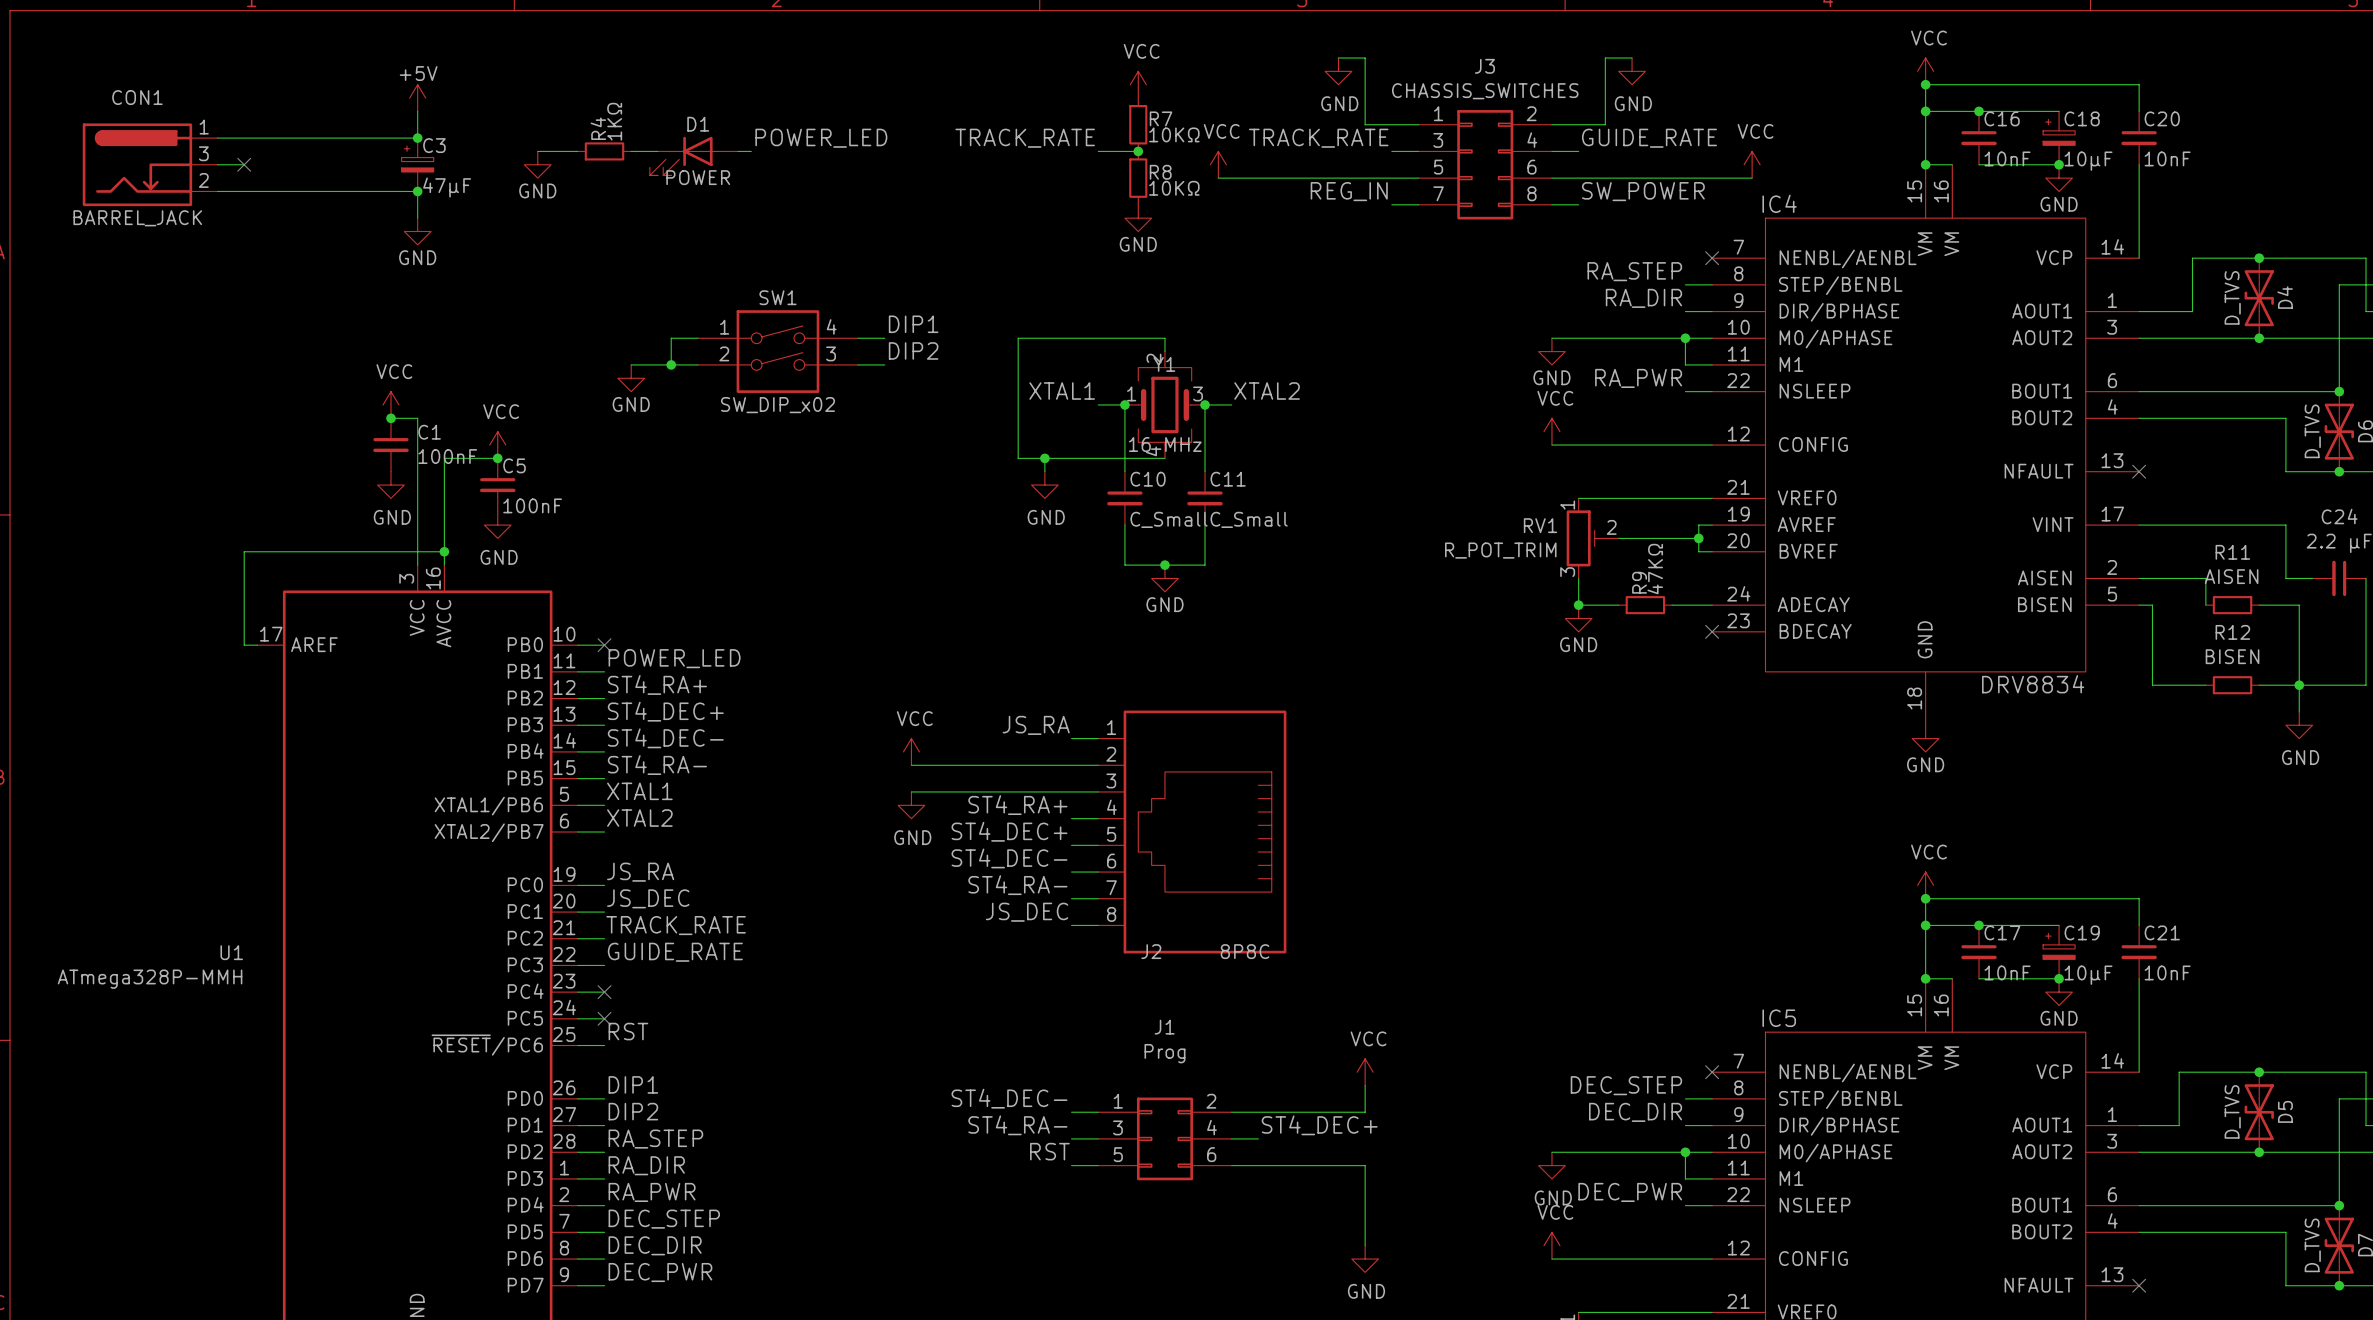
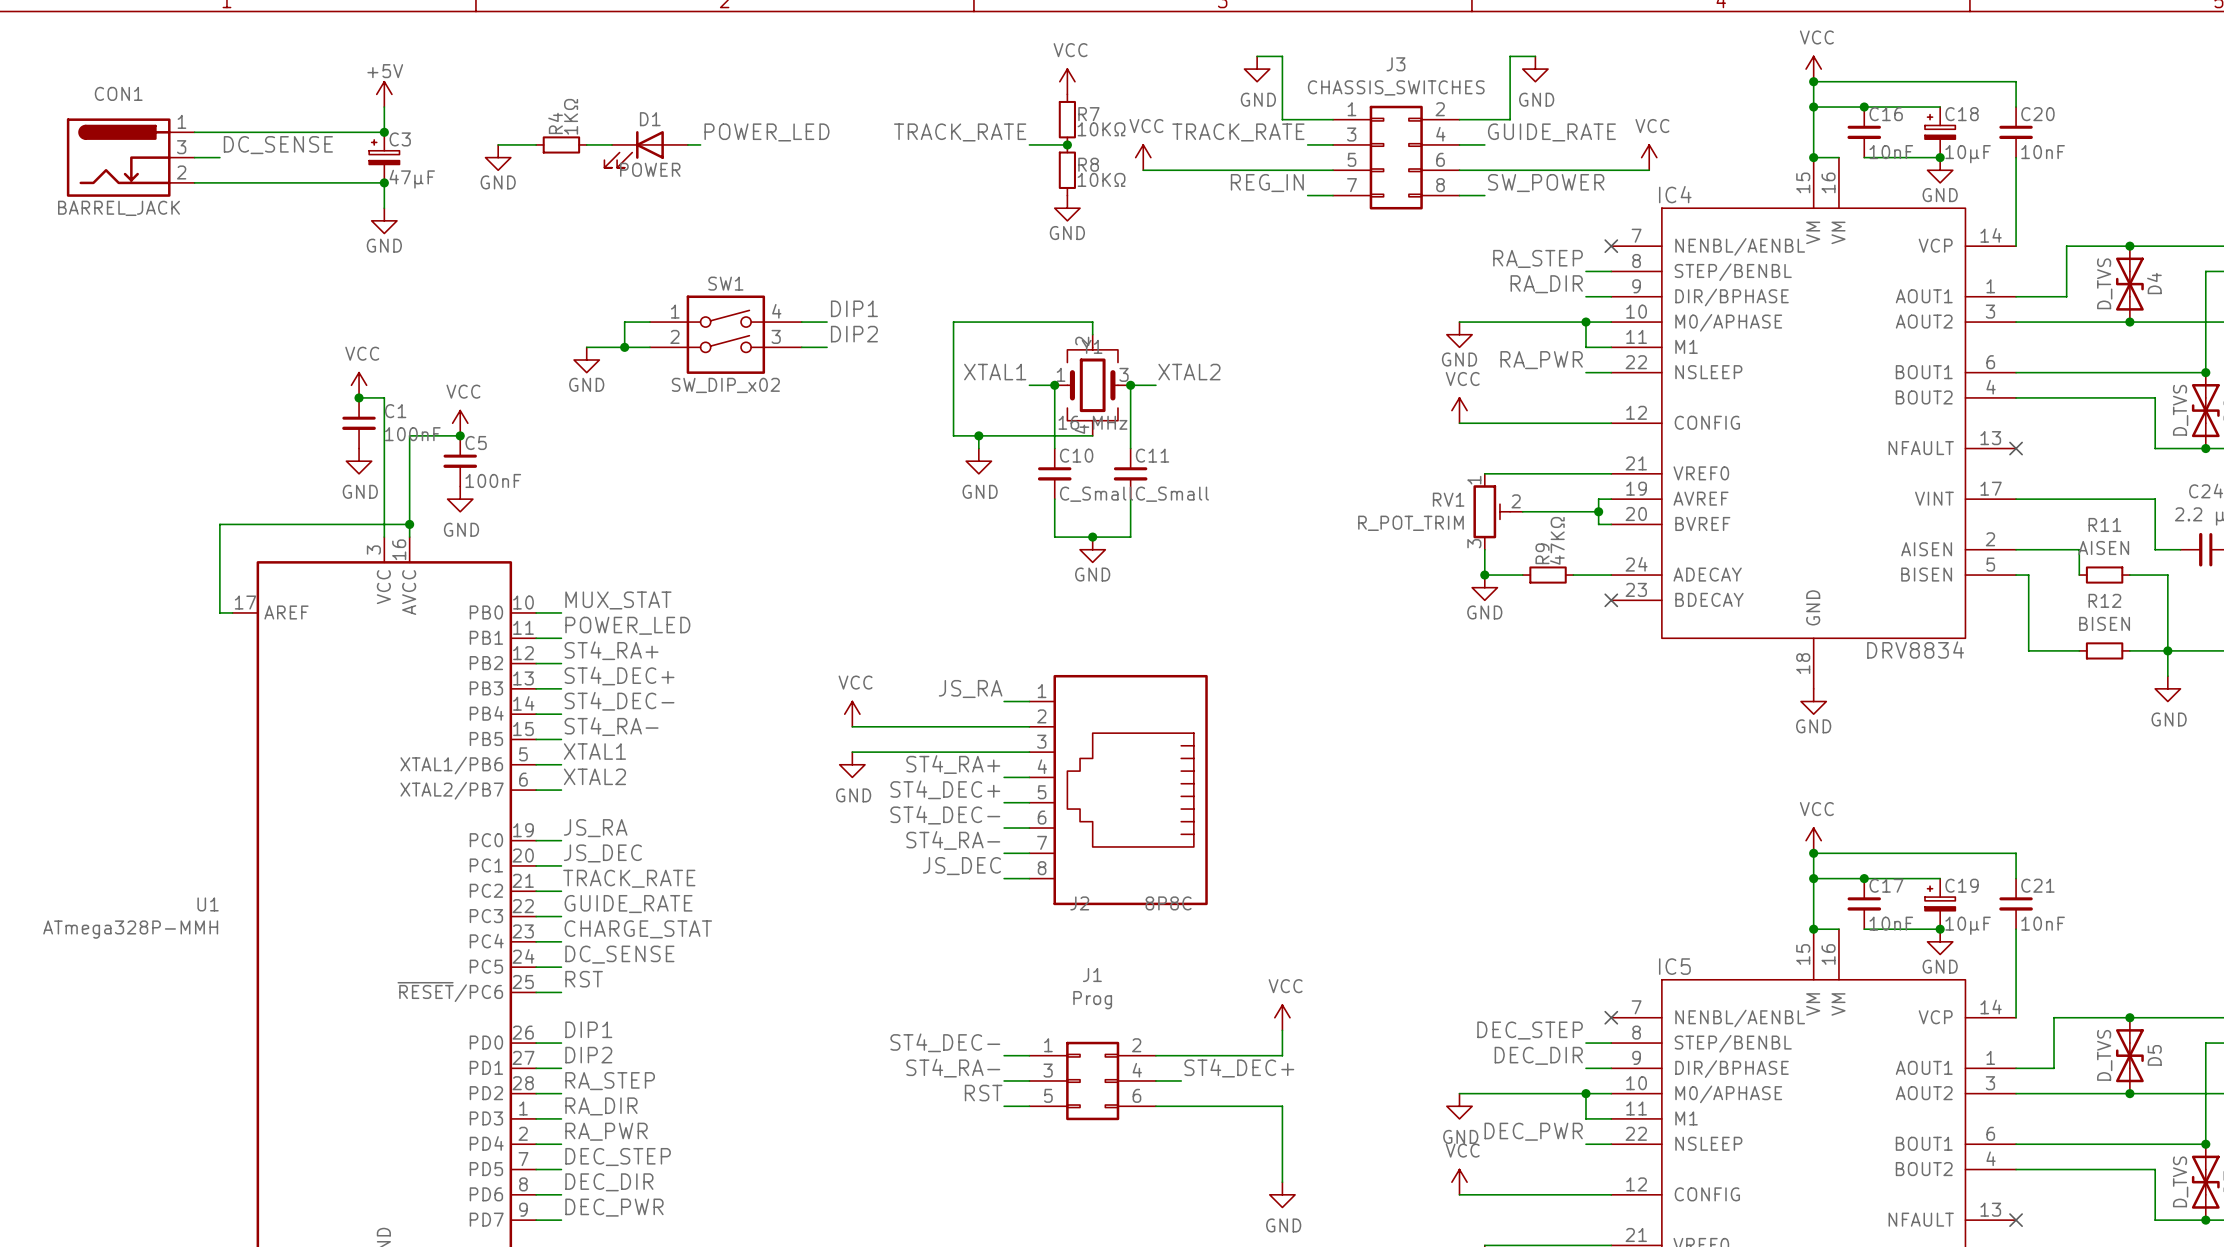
label: none -> DC_SENSE (278, 145)
no-connect mark: (244, 164) -> none
label: none -> MUX_STAT (618, 600)
no-connect mark: (604, 645) -> none
label: none -> CHARGE_STAT (638, 929)
no-connect mark: (604, 992) -> none
label: none -> DC_SENSE (619, 954)
no-connect mark: (604, 1018) -> none

